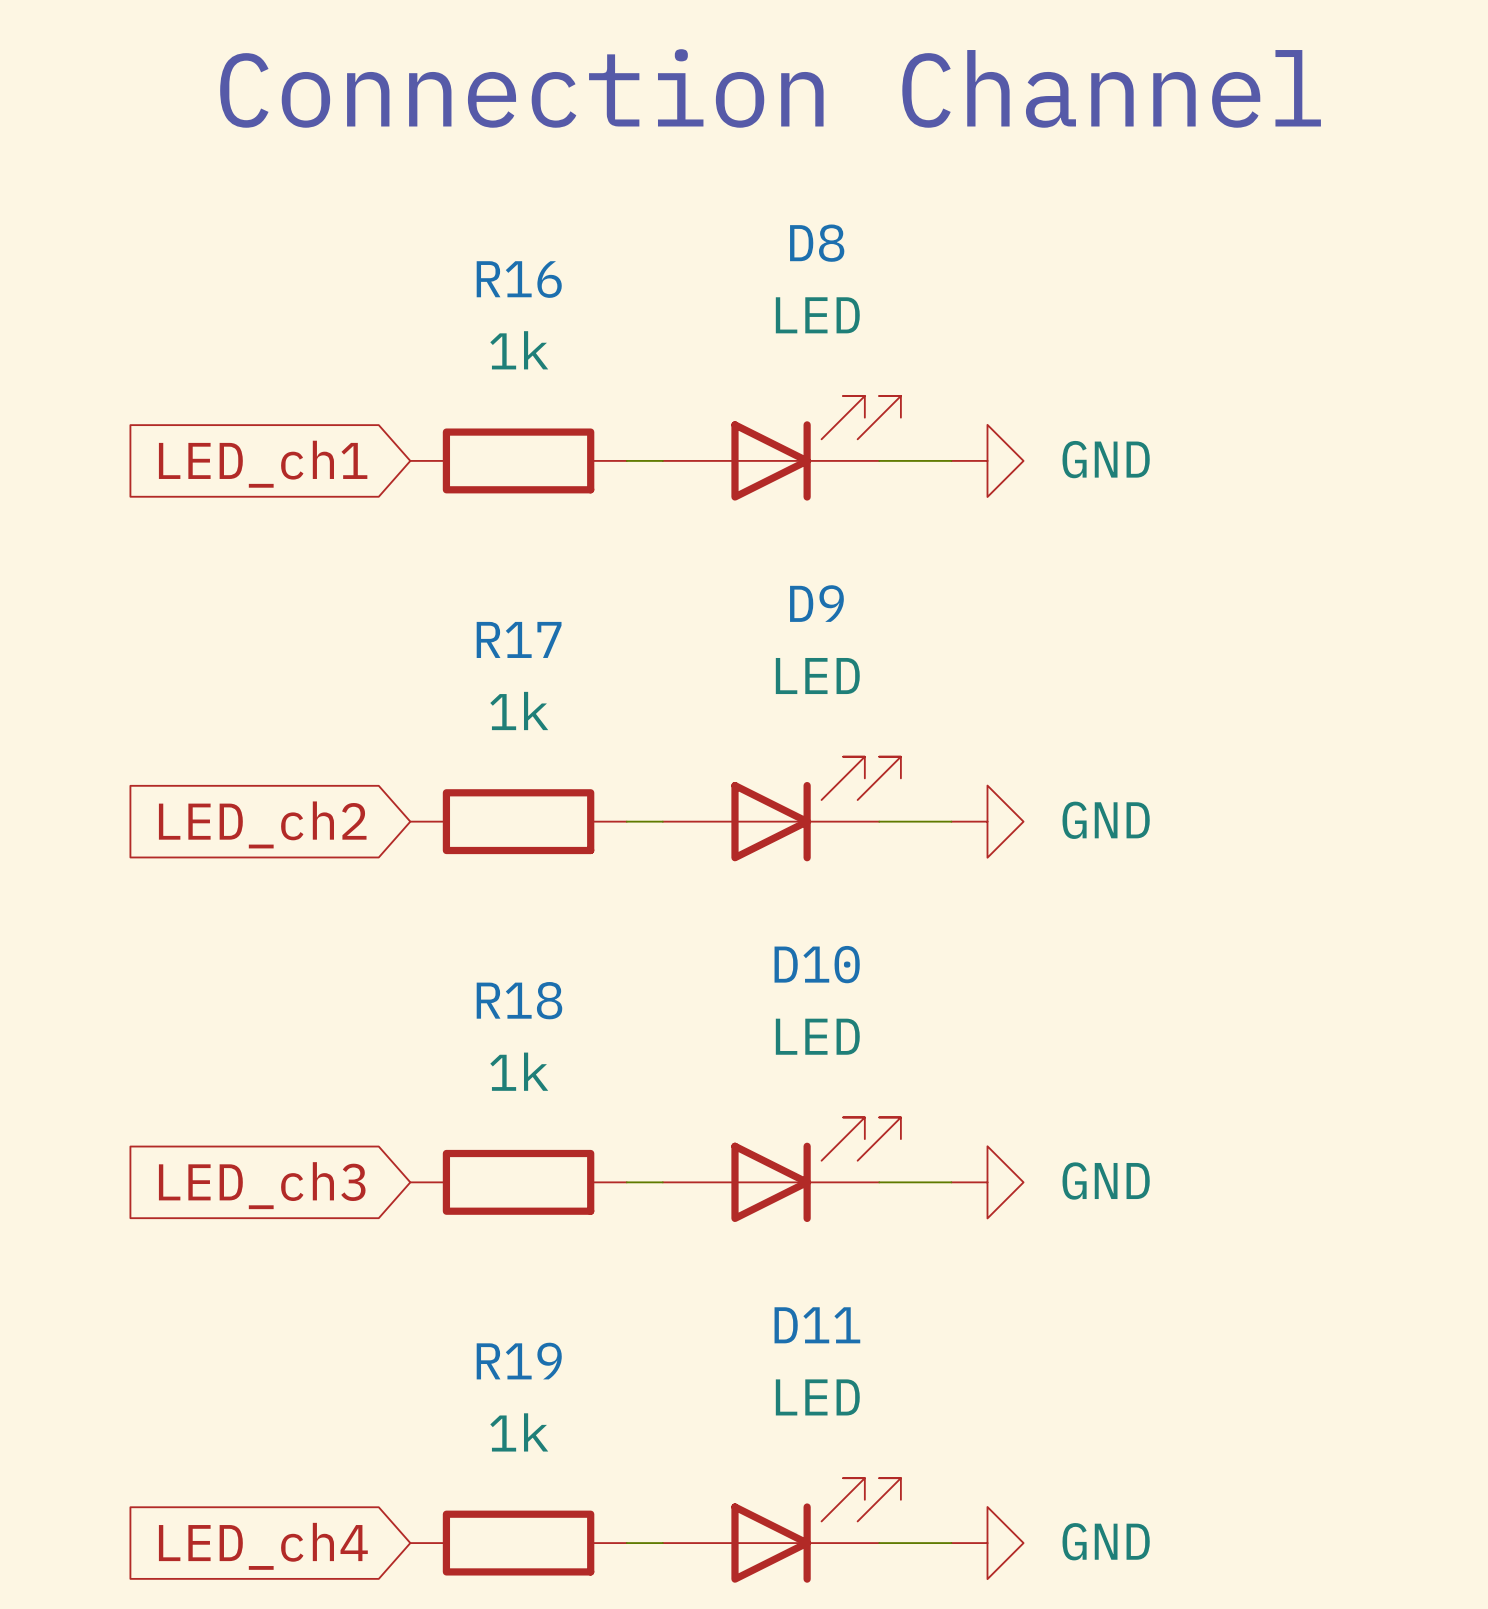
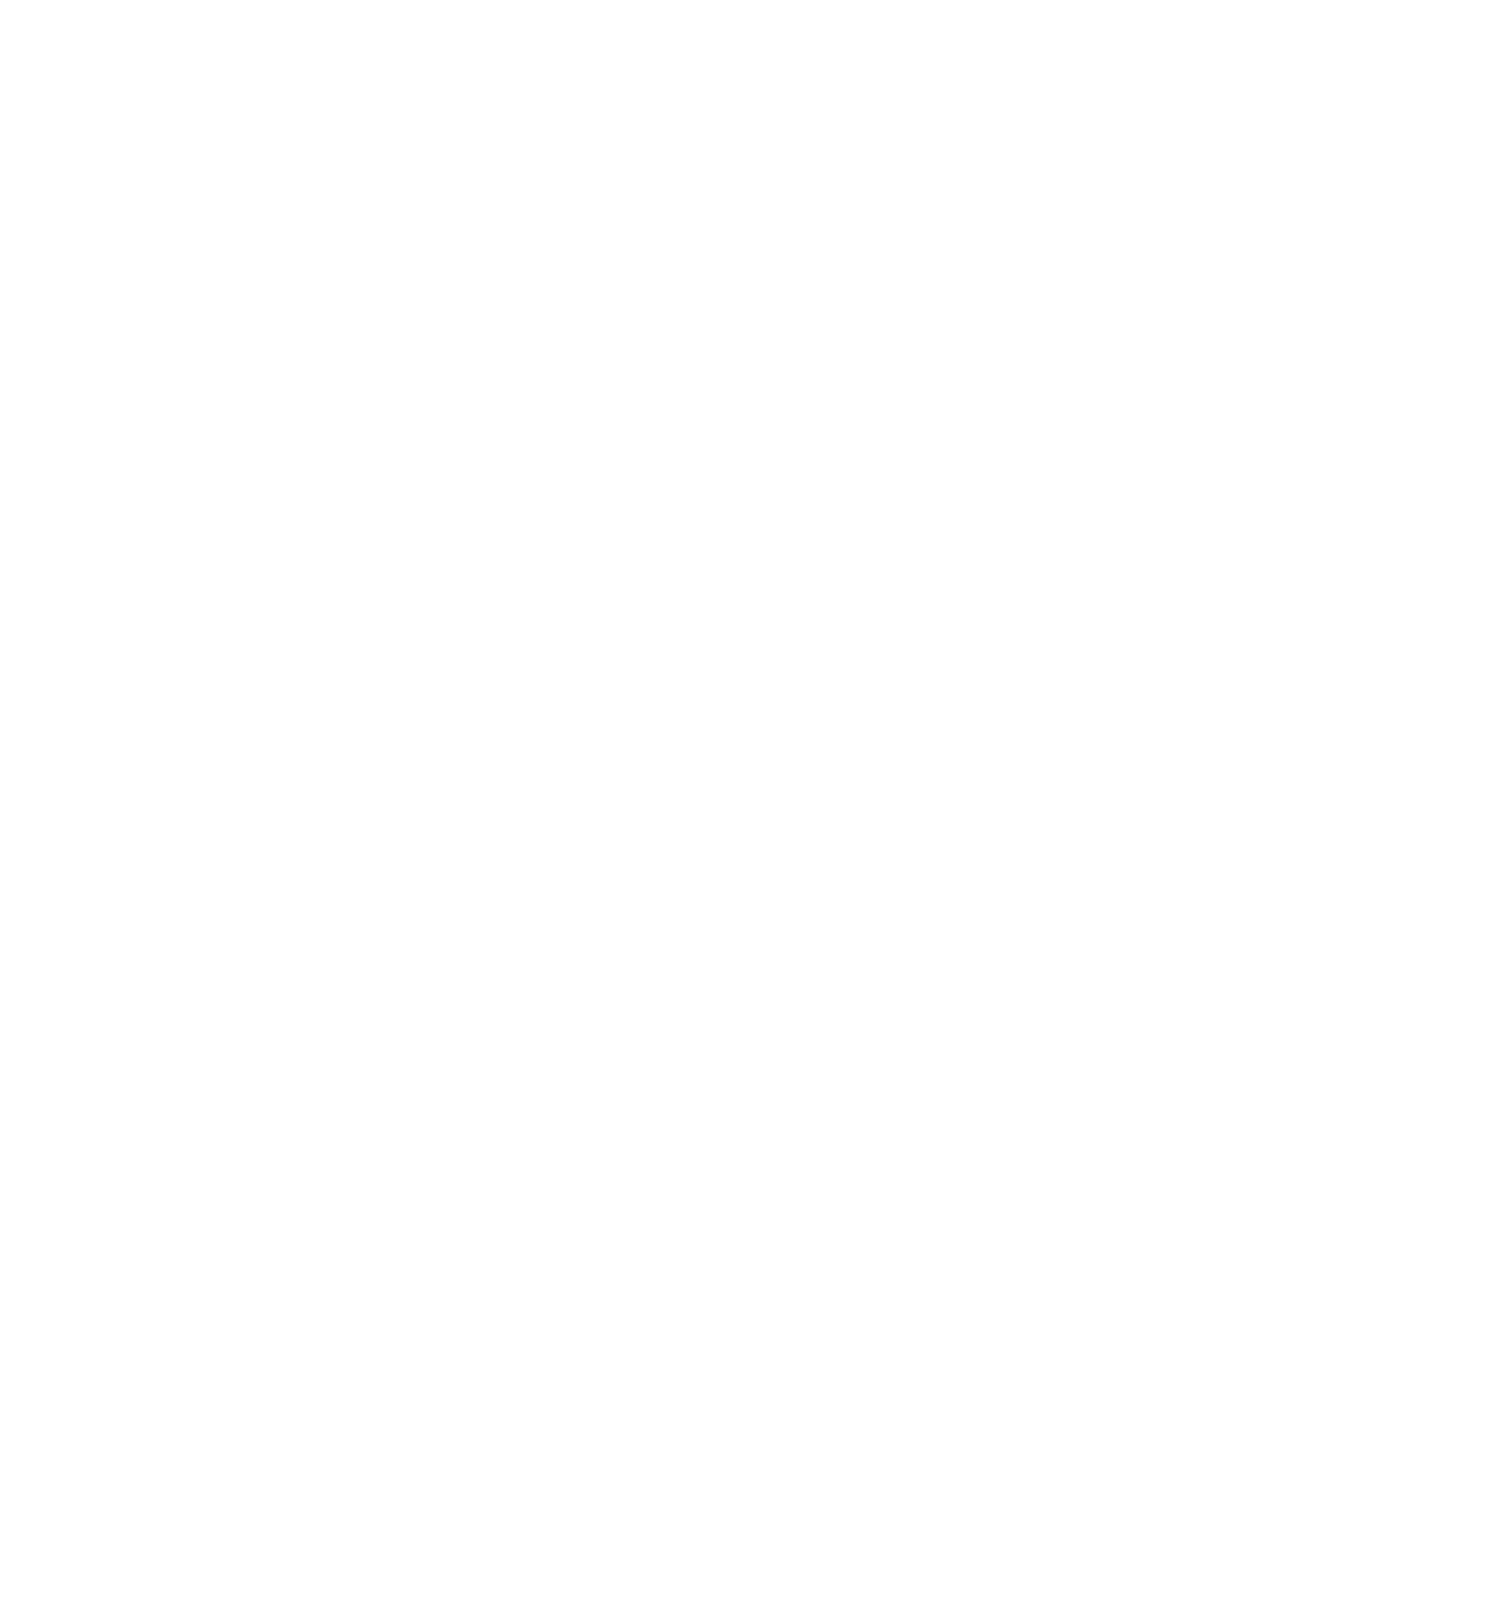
text: Connection Channel (770, 88) -> none
D8: LED (781, 448) -> none
R16: 1k (518, 460) -> none
wire: (626, 460) (662, 460) -> none
wire: (879, 460) (951, 460) -> none
power symbol: GND (987, 460) -> none
global label: LED_ch1 (263, 464) -> none
D9: LED (781, 809) -> none
R17: 1k (518, 821) -> none
wire: (626, 821) (662, 821) -> none
wire: (879, 821) (951, 821) -> none
power symbol: GND (987, 821) -> none
global label: LED_ch2 (262, 824) -> none
D10: LED (781, 1169) -> none
R18: 1k (518, 1182) -> none
wire: (626, 1182) (662, 1182) -> none
wire: (879, 1182) (951, 1182) -> none
power symbol: GND (987, 1182) -> none
global label: LED_ch3 (262, 1185) -> none
D11: LED (781, 1530) -> none
R19: 1k (518, 1543) -> none
wire: (626, 1543) (662, 1543) -> none
wire: (879, 1543) (951, 1543) -> none
power symbol: GND (987, 1543) -> none
global label: LED_ch4 (263, 1546) -> none

